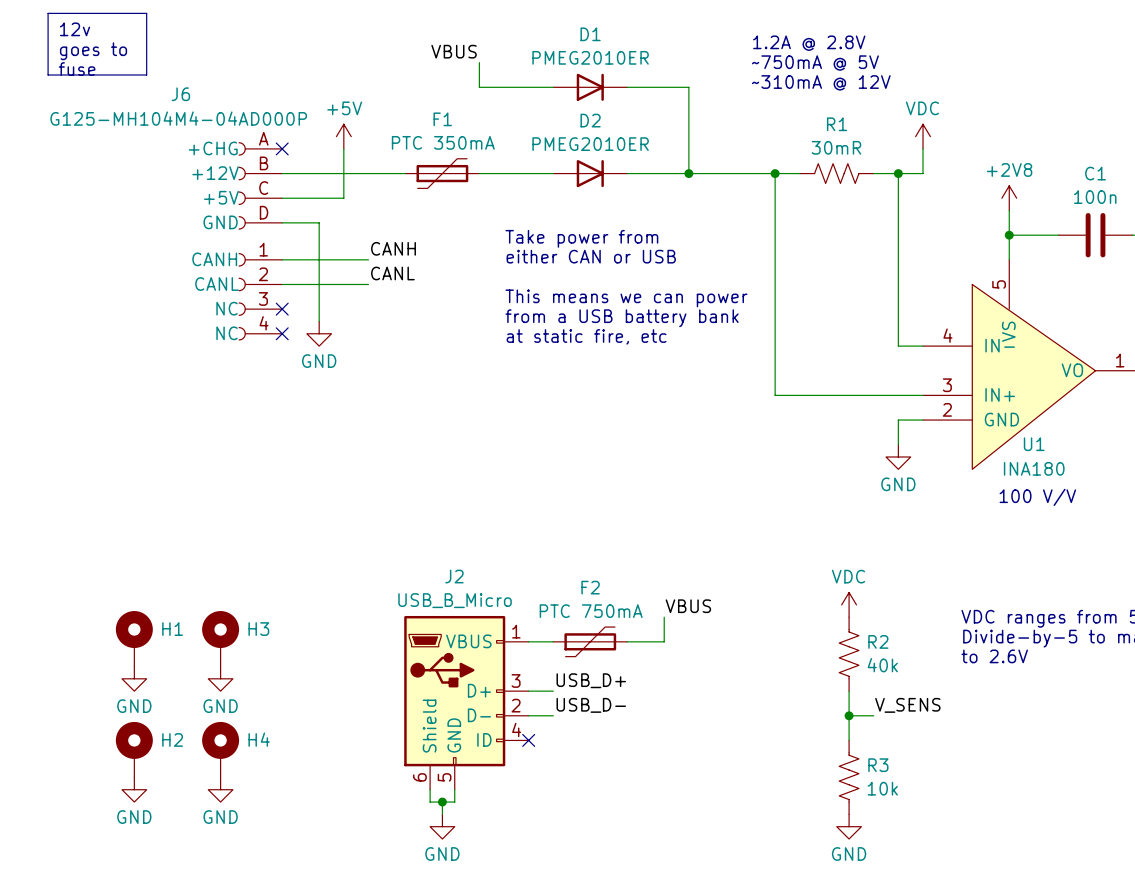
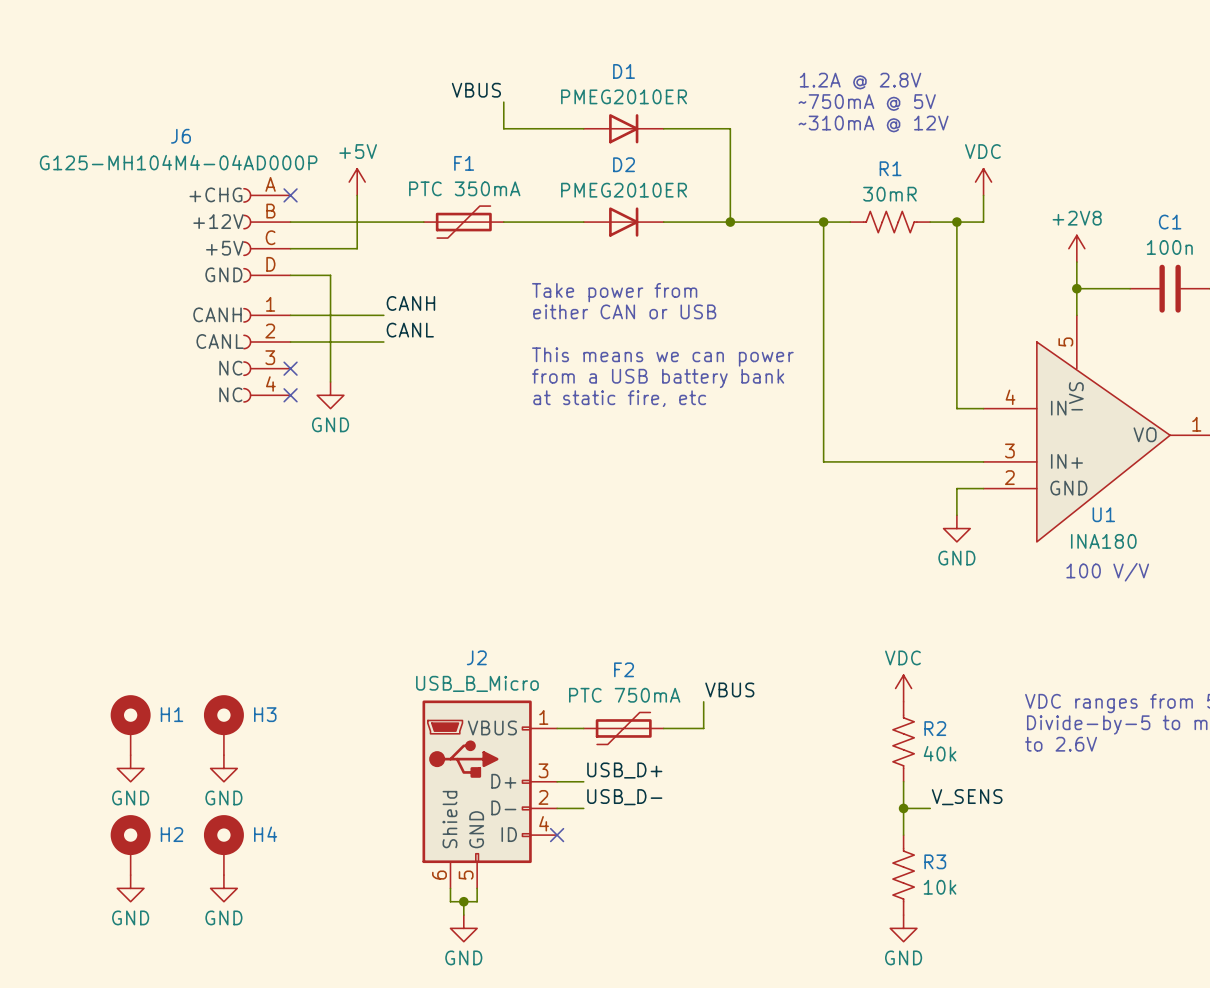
line: (48, 13) (146, 13) (146, 74) (48, 74) (48, 13) -> none
text: 12v (75, 29) -> none
text: goes to (93, 51) -> none
text: fuse (77, 69) -> none

